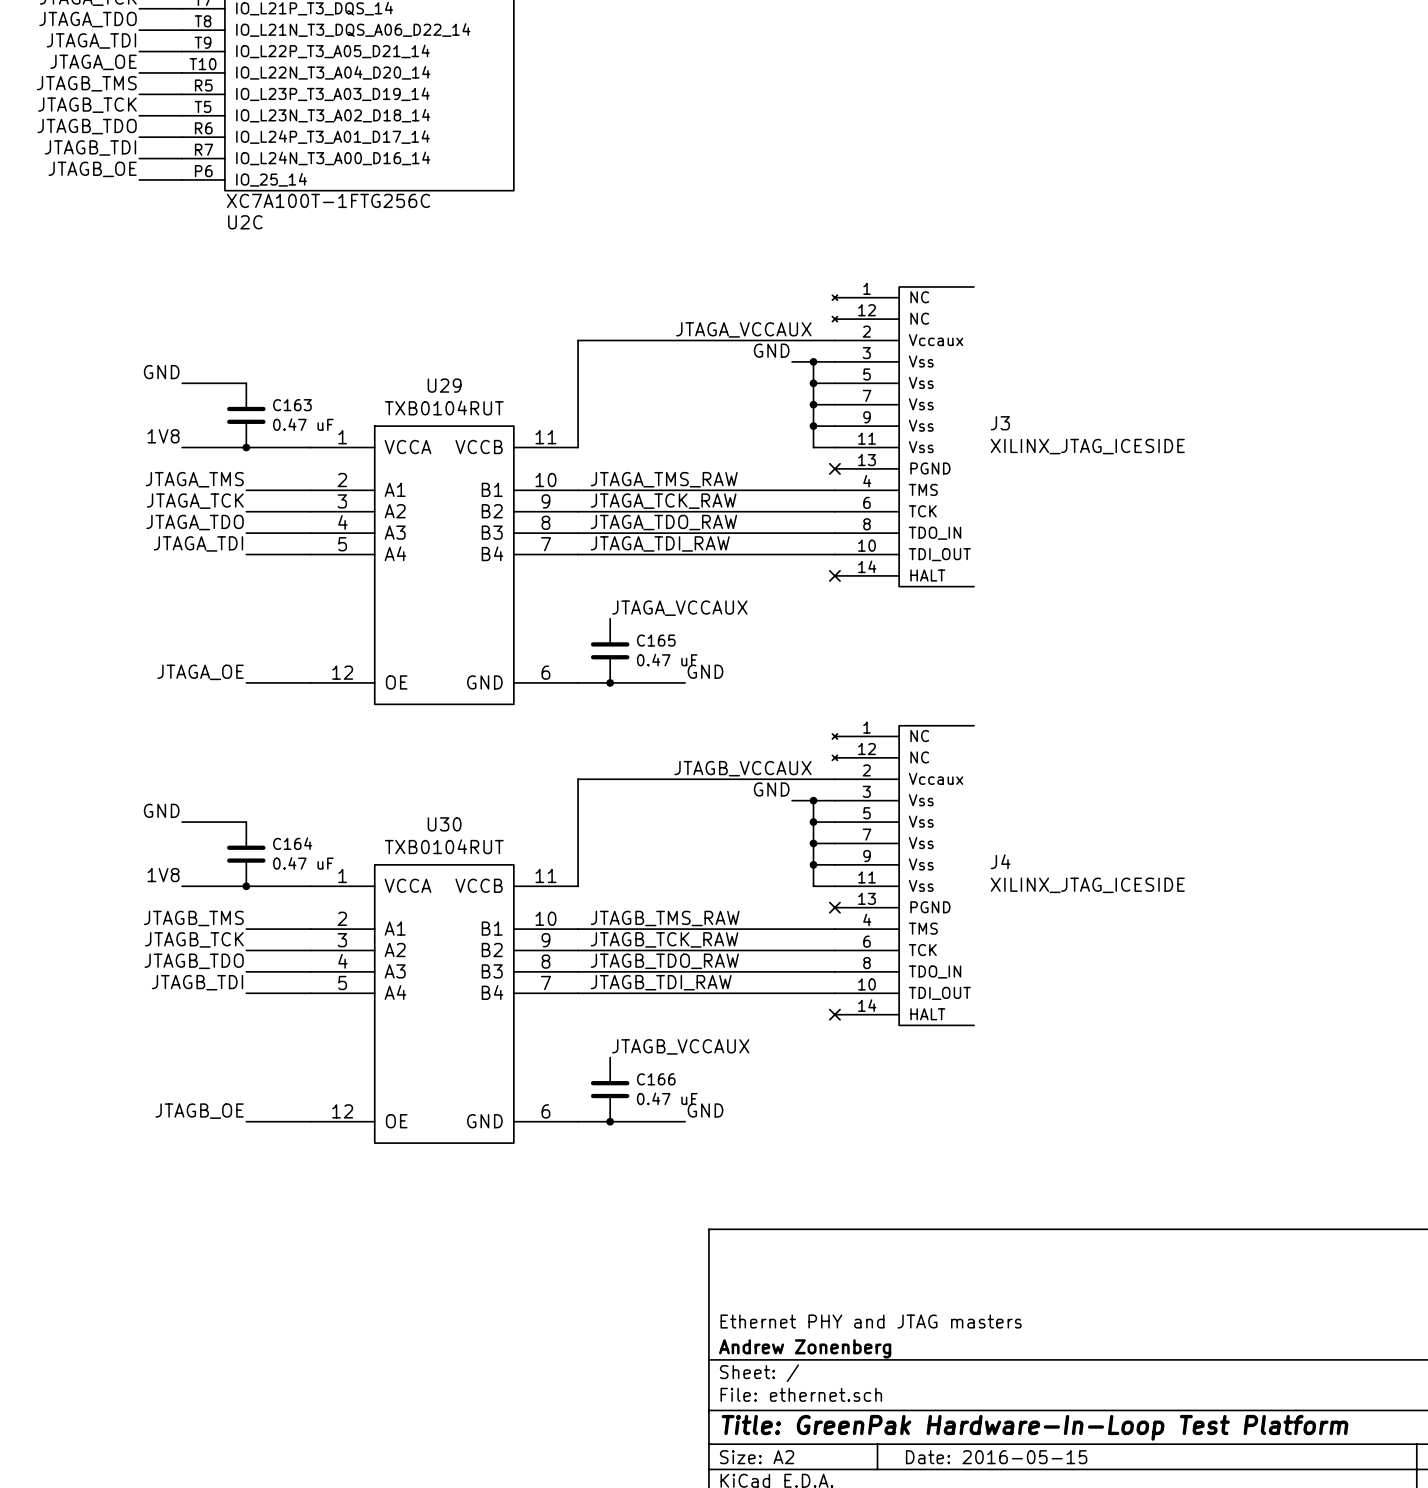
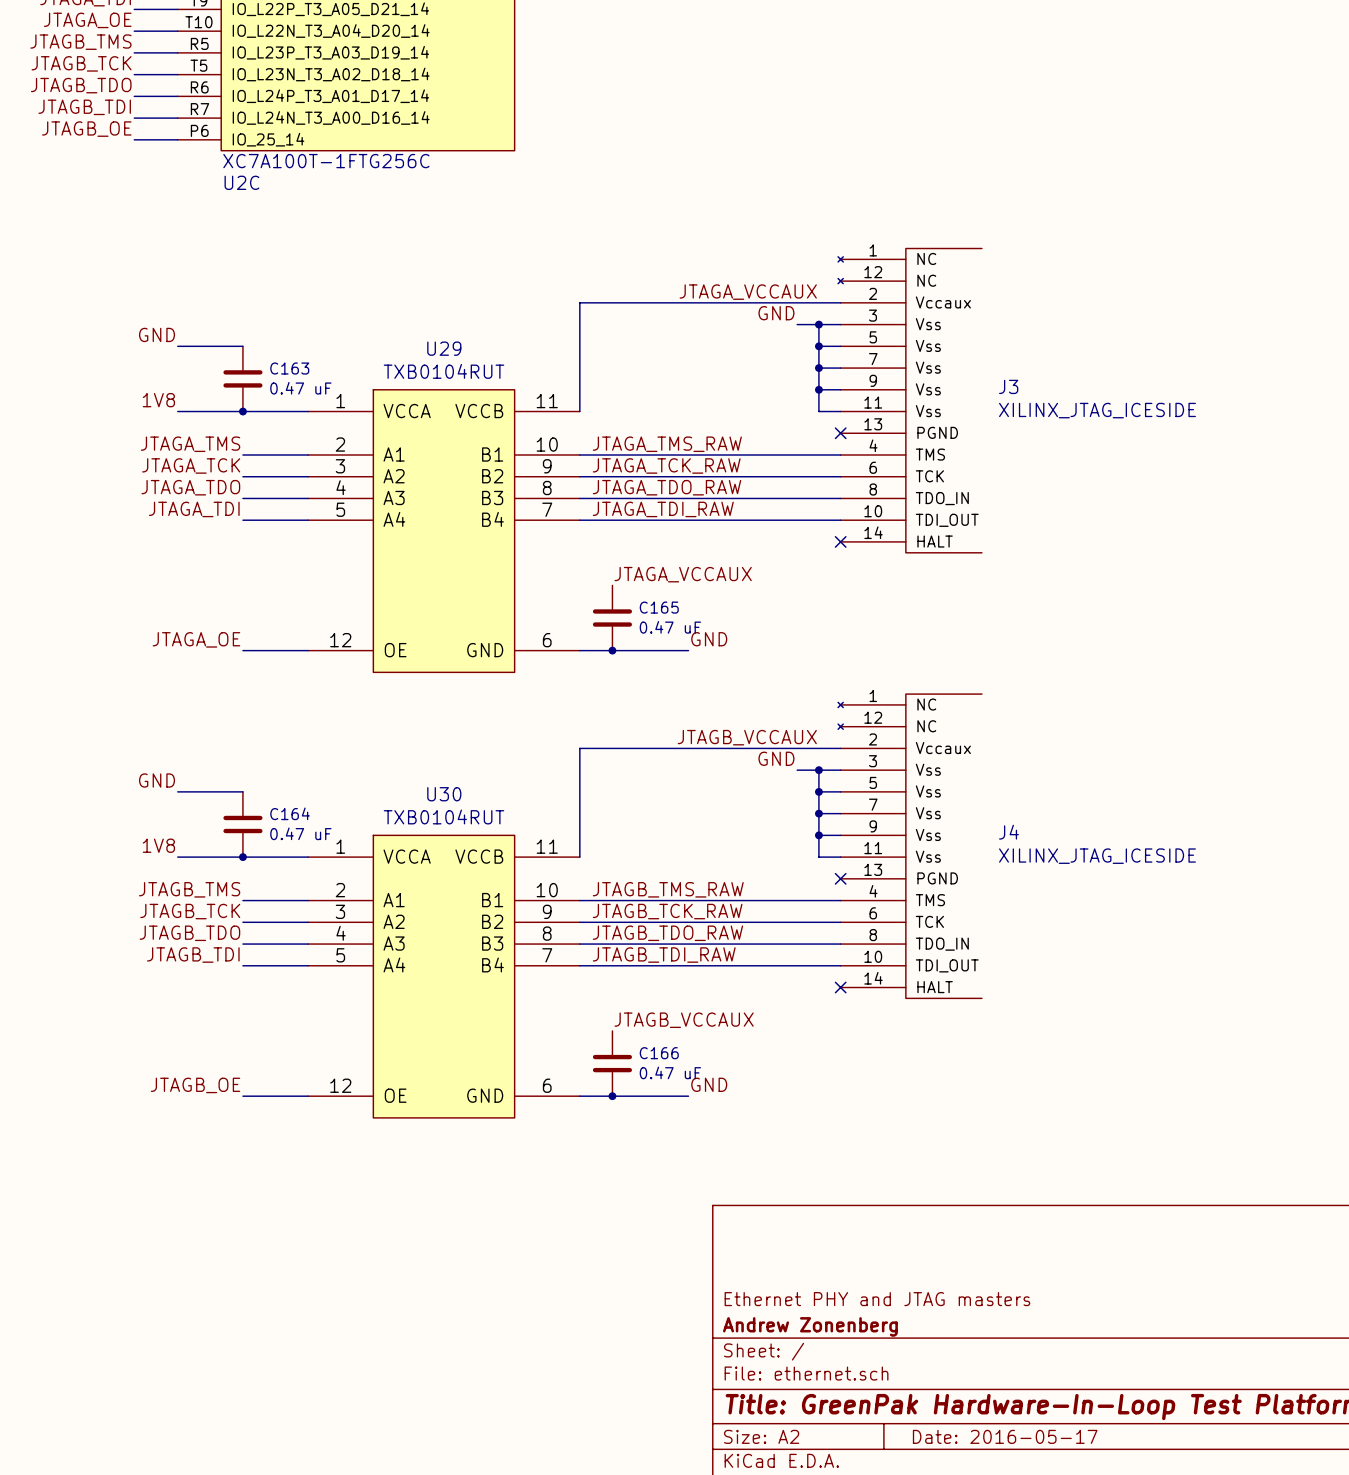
title block: Date: 2016-05-15 (996, 1457) -> Date: 2016-05-17 (1005, 1436)

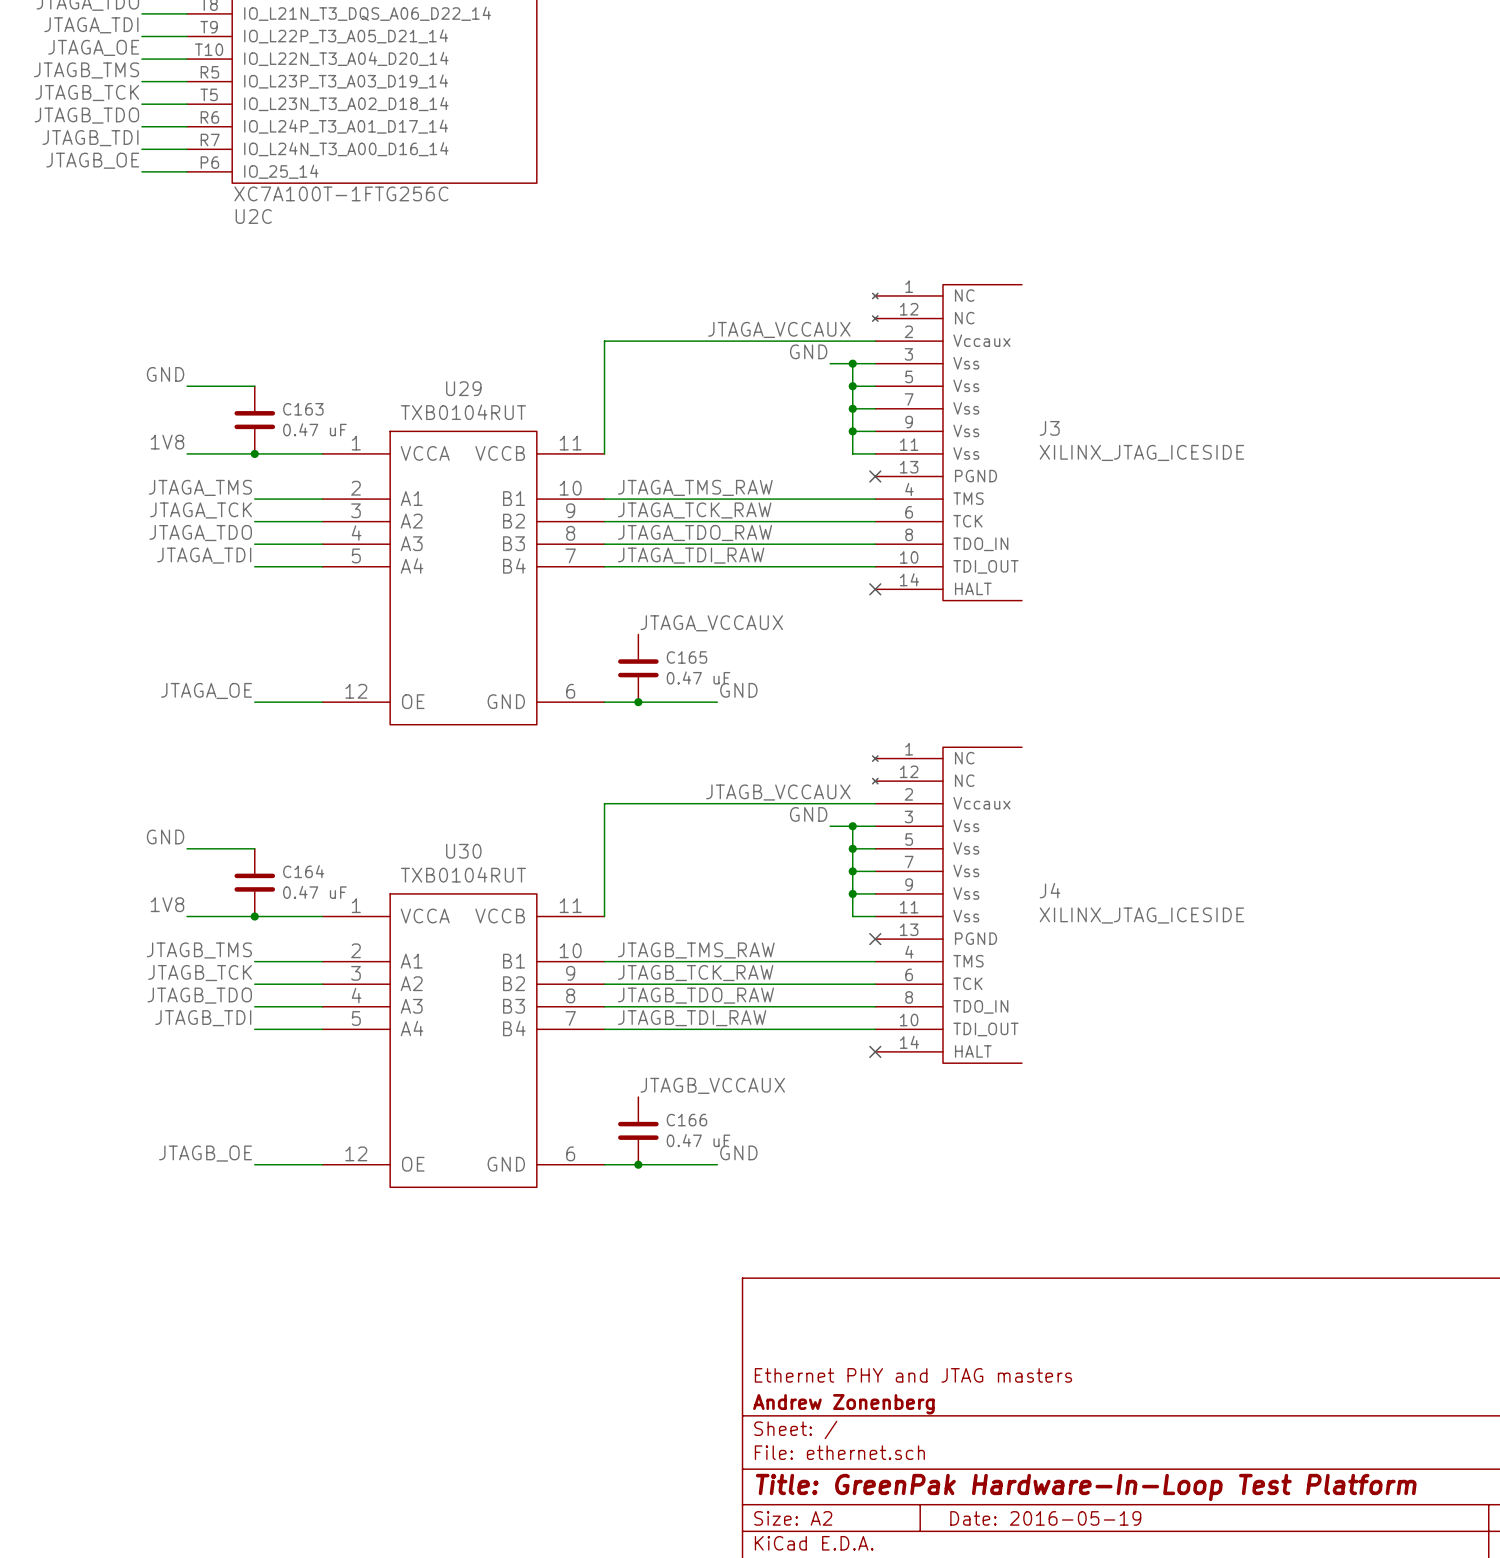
title block: Date: 2016-05-17 (1005, 1436) -> Date: 2016-05-19 (1045, 1518)

